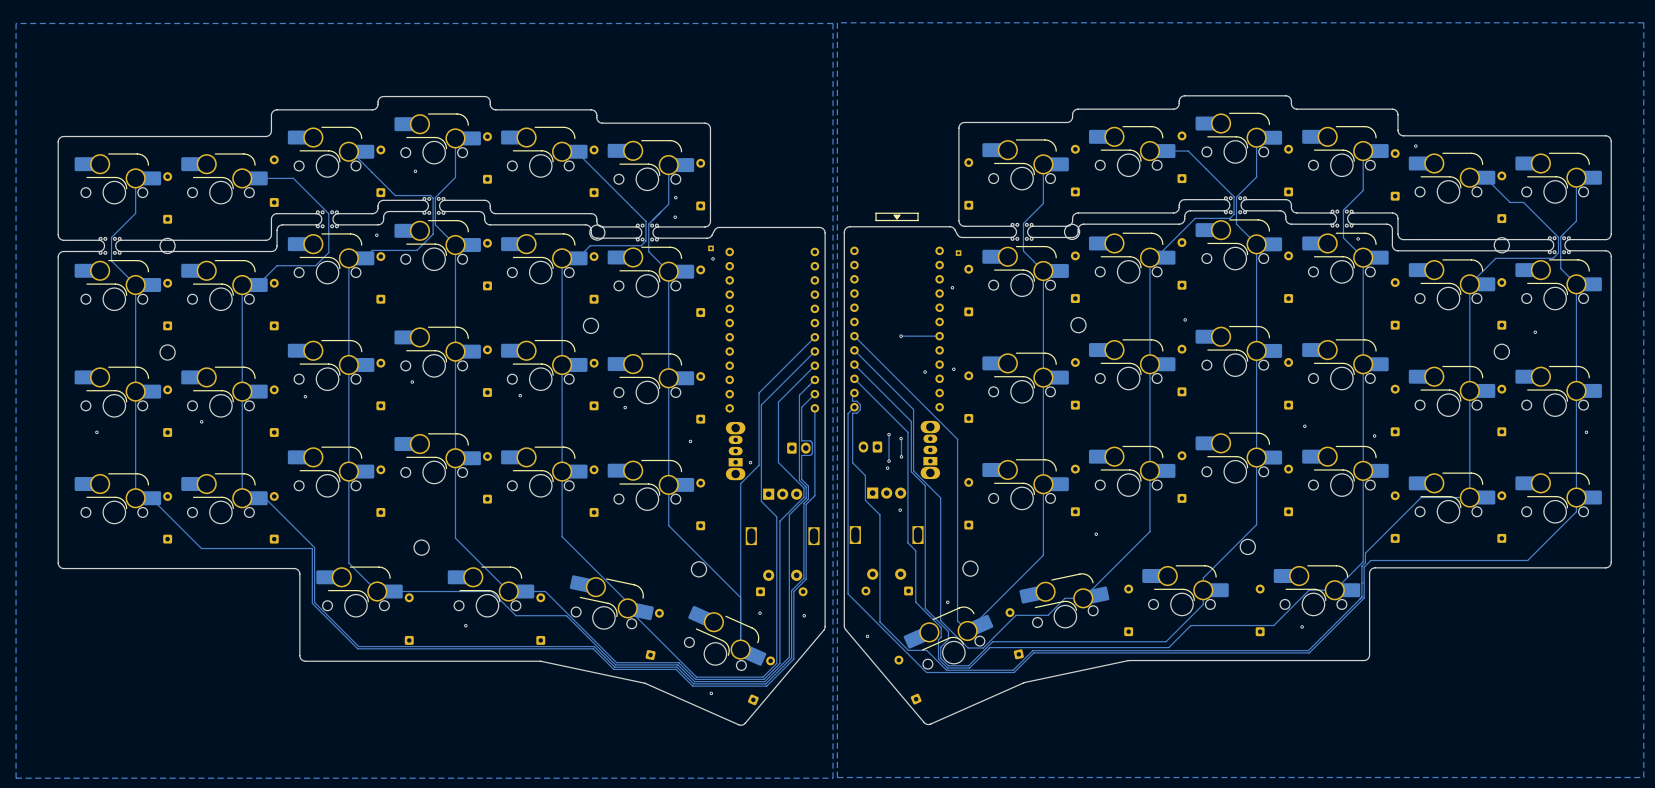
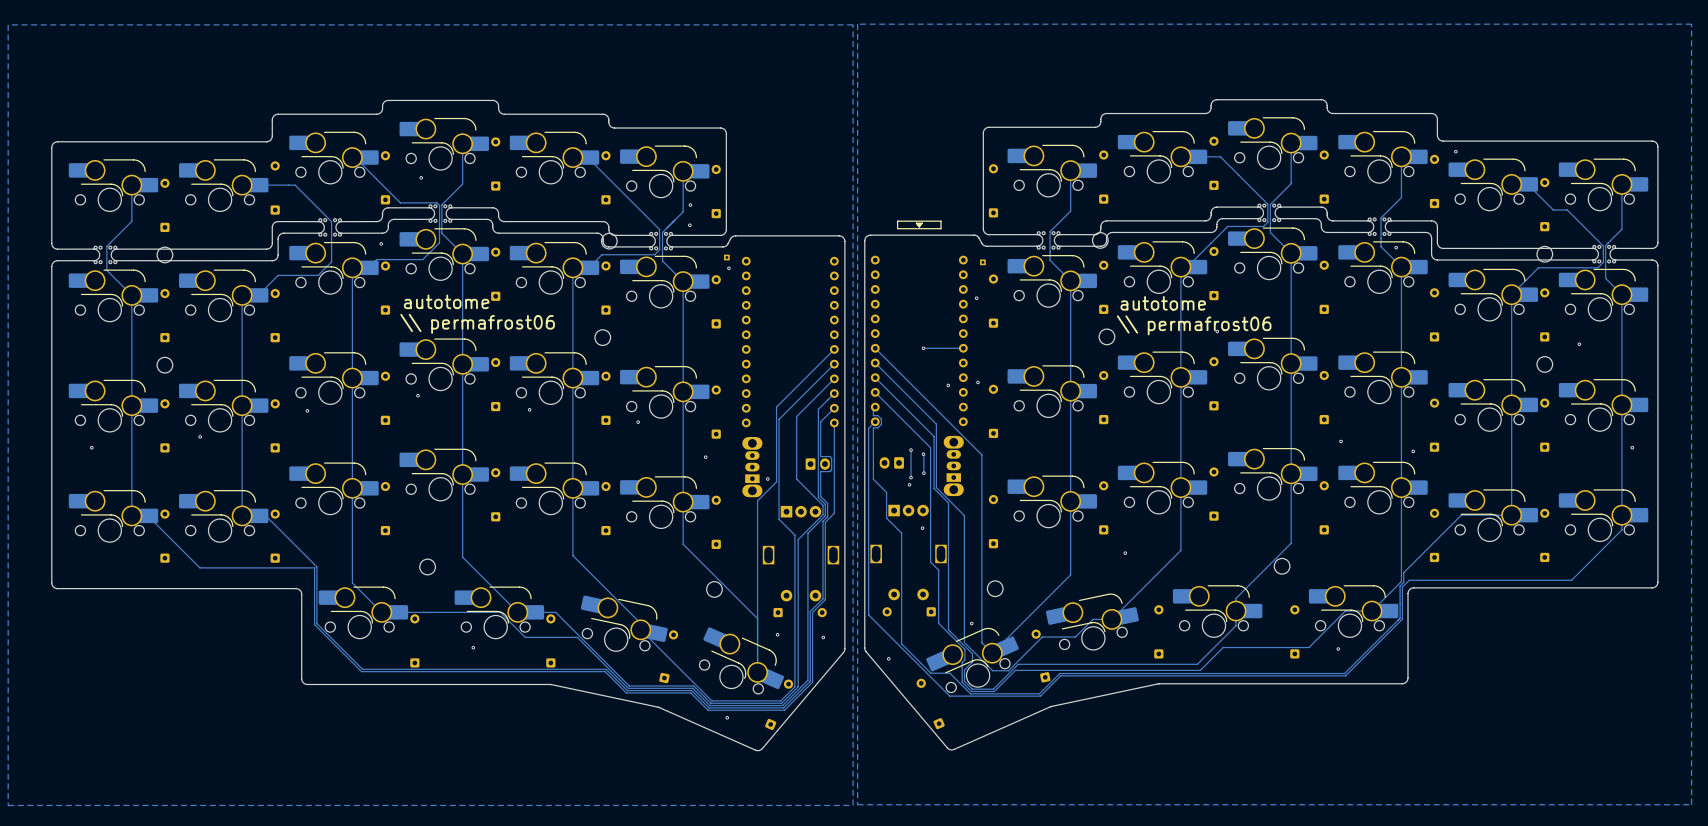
text: none -> autotome (446, 301)
text: none -> autotome (1163, 303)
text: none -> \\ permafrost06 (477, 323)
text: none -> \\ permafrost06 (1194, 325)

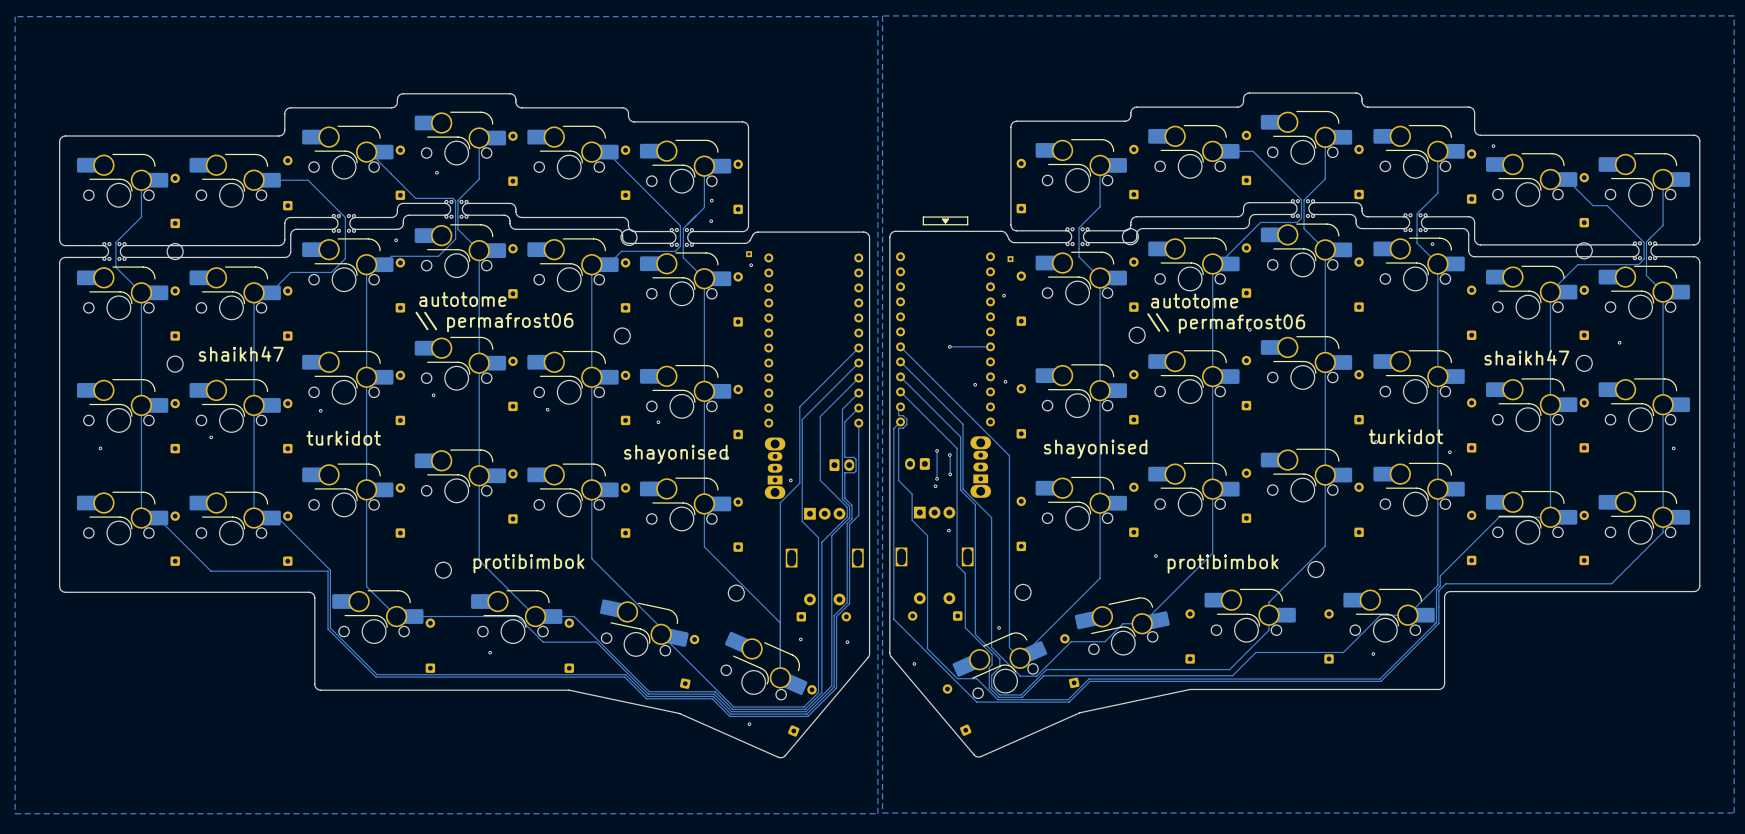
text: none -> shaikh47 (241, 353)
text: none -> shaikh47 (1526, 357)
text: none -> turkidot (1405, 436)
text: none -> turkidot (343, 438)
text: none -> shayonised (1095, 449)
text: none -> shayonised (675, 454)
text: none -> protibimbok (528, 563)
text: none -> protibimbok (1223, 563)

